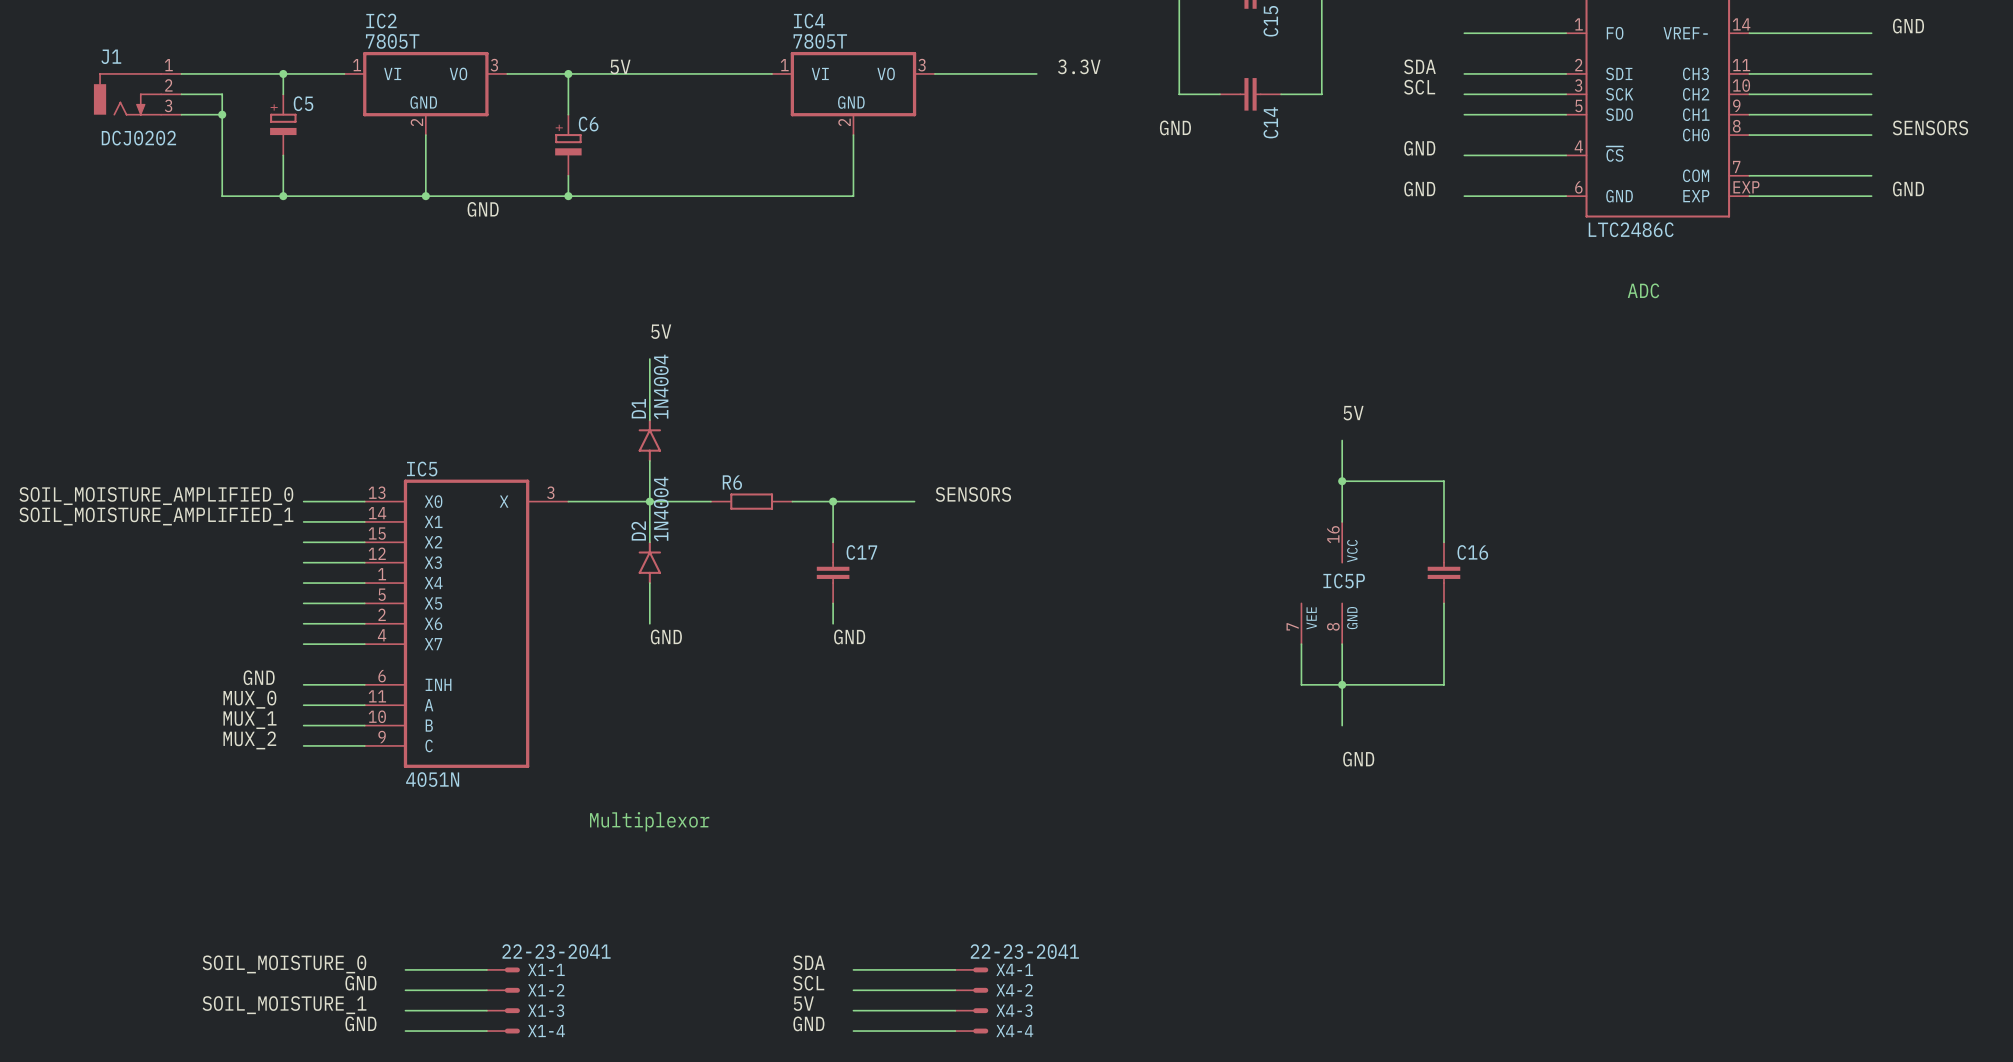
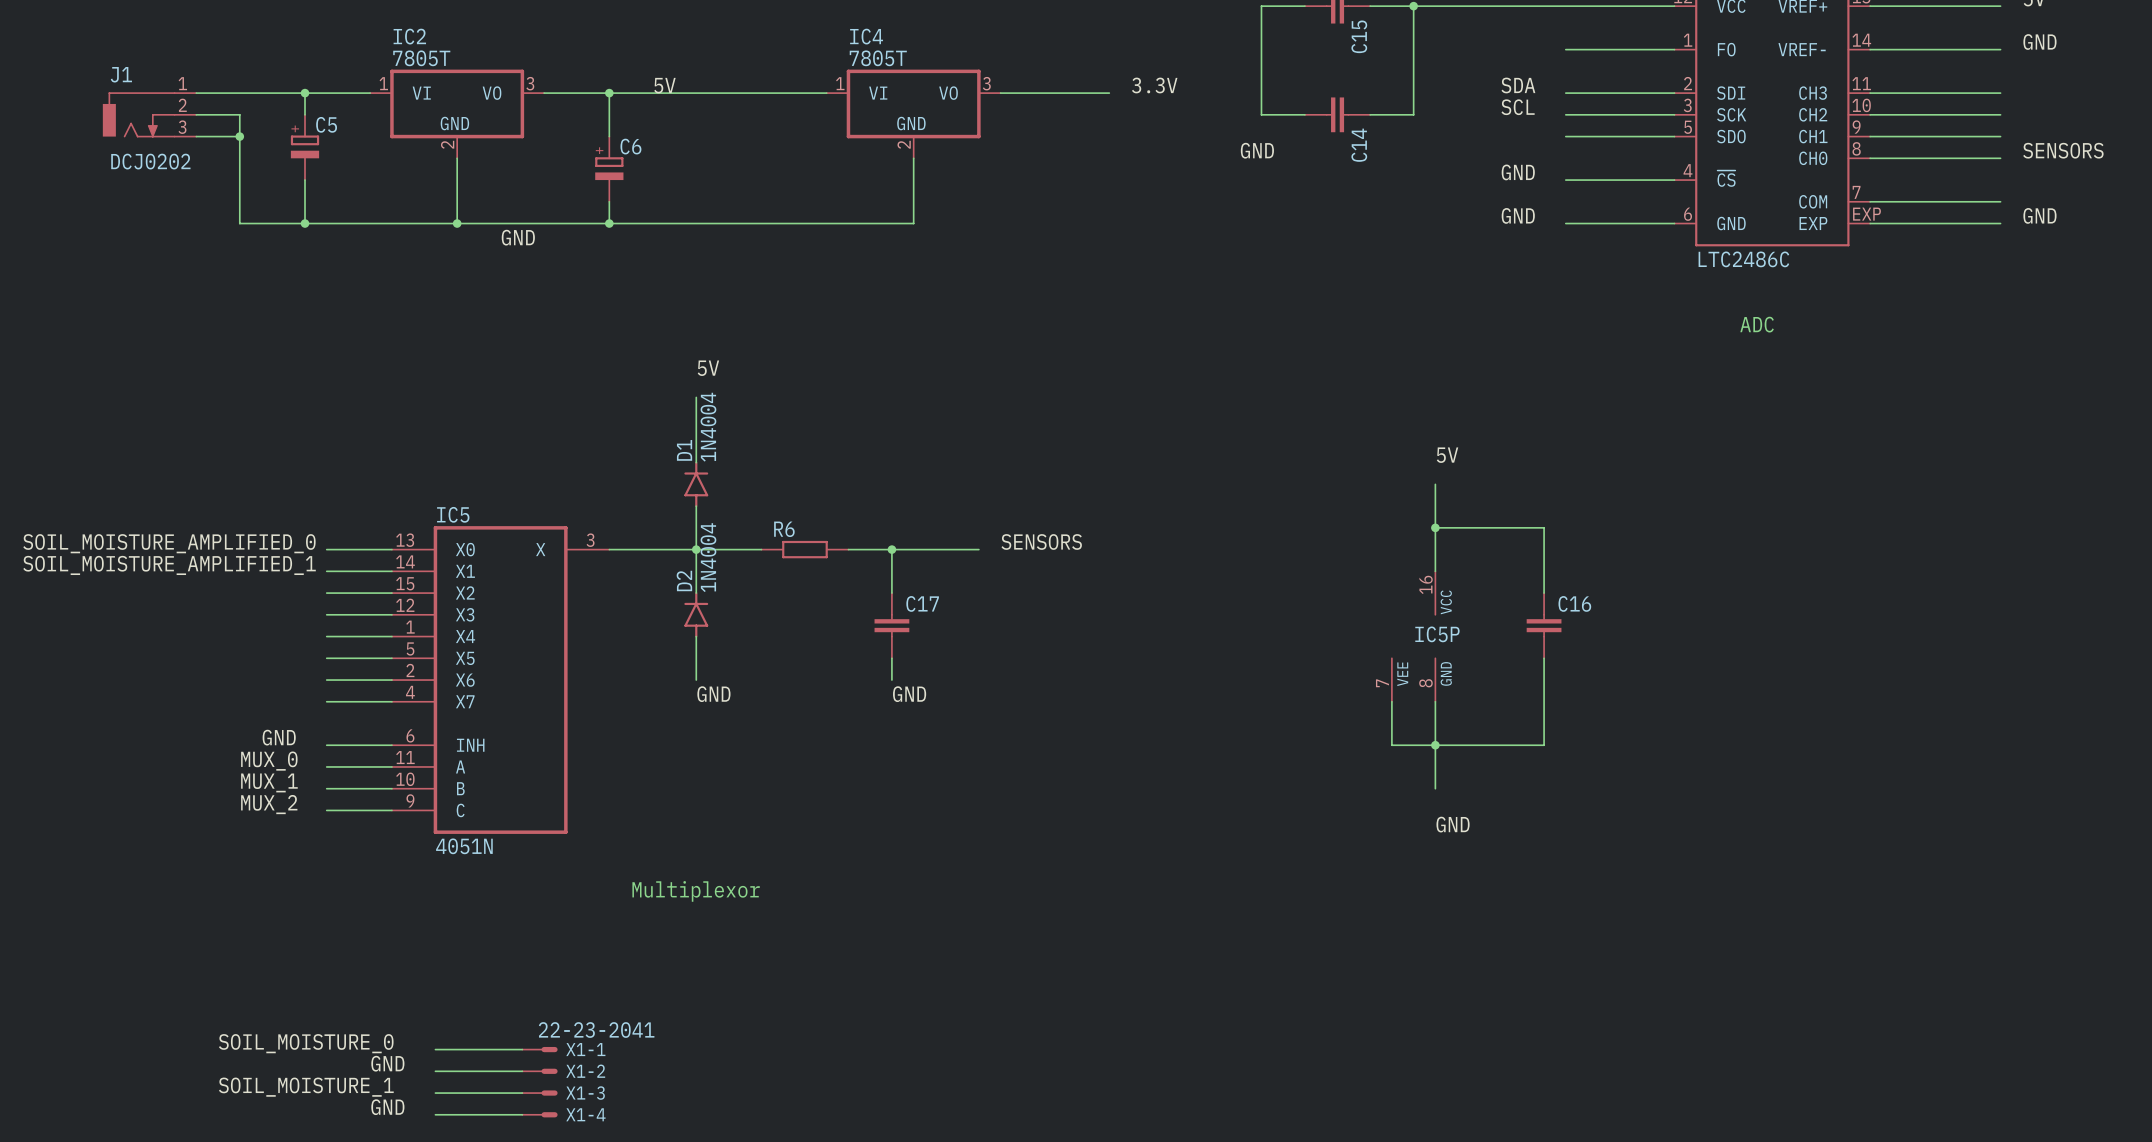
label: SDA (809, 962) -> none
wire: (853, 969) (955, 969) -> none
X4-1: 22-23-2041 (971, 969) -> none
label: SCL (808, 983) -> none
wire: (853, 990) (955, 990) -> none
X4-2: (971, 990) -> none
label: 5V (803, 1003) -> none
wire: (853, 1010) (955, 1010) -> none
X4-3: (971, 1010) -> none
label: GND (808, 1023) -> none
wire: (853, 1031) (955, 1031) -> none
X4-4: (971, 1031) -> none

